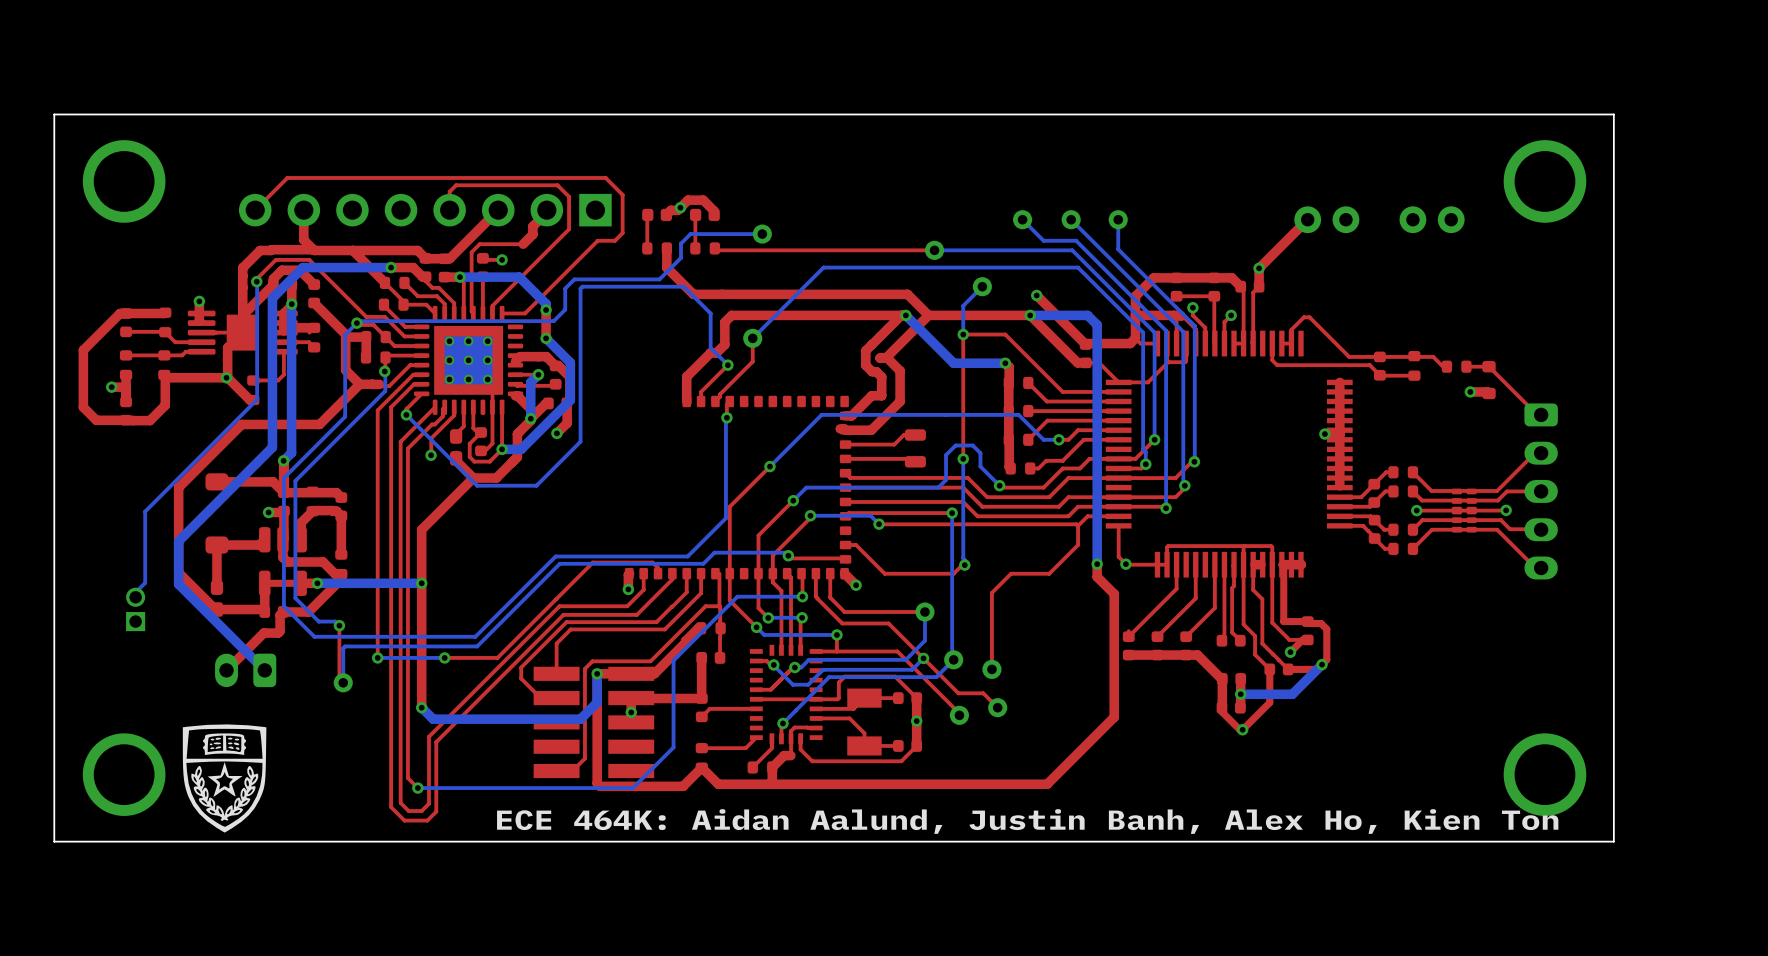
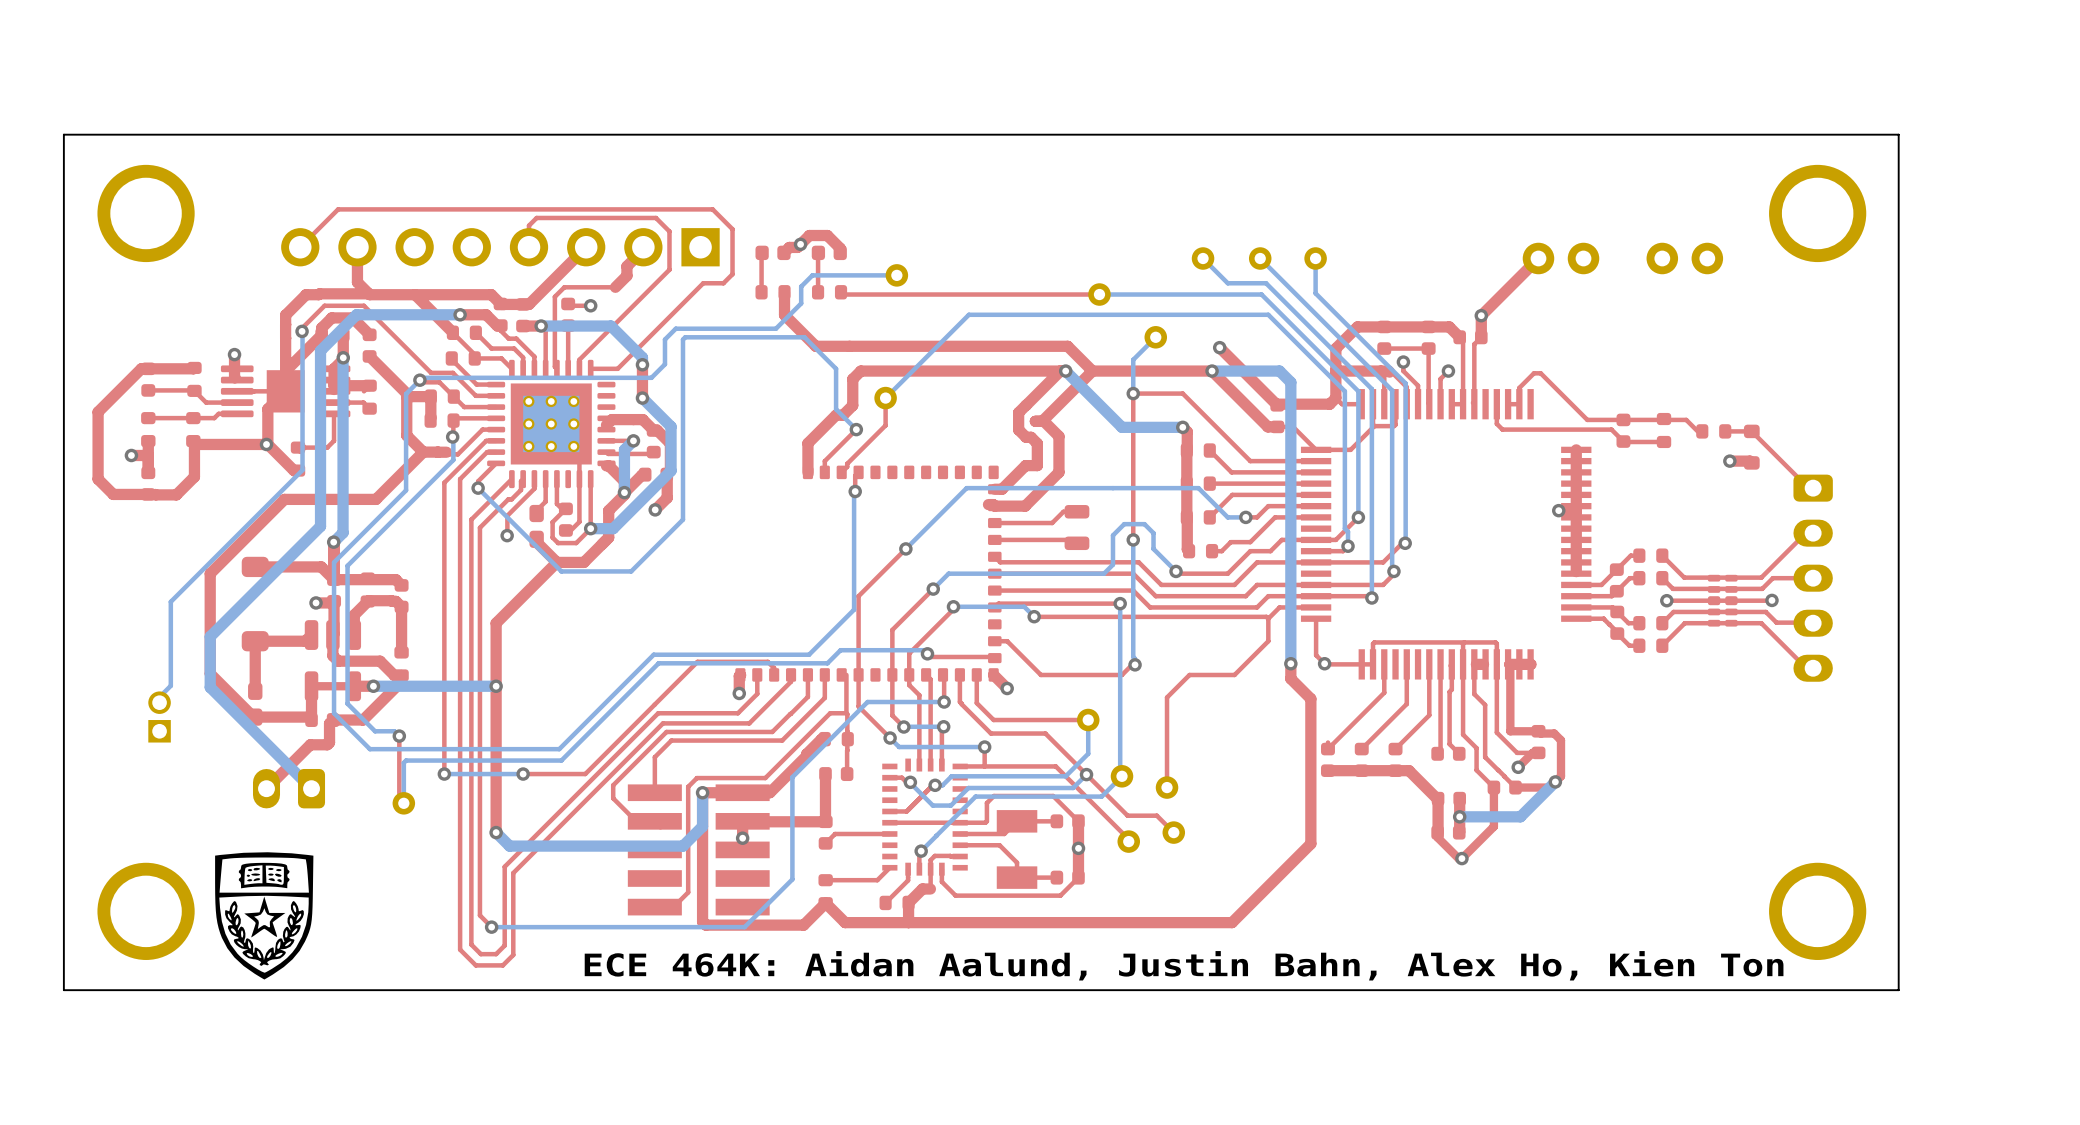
text: ECE 464K: Aidan Aalund, Justin Banh, Alex Ho, Kien Ton (1027, 821) -> ECE 464K: Aidan Aalund, Justin Bahn, Alex Ho, Kien Ton (1184, 965)

